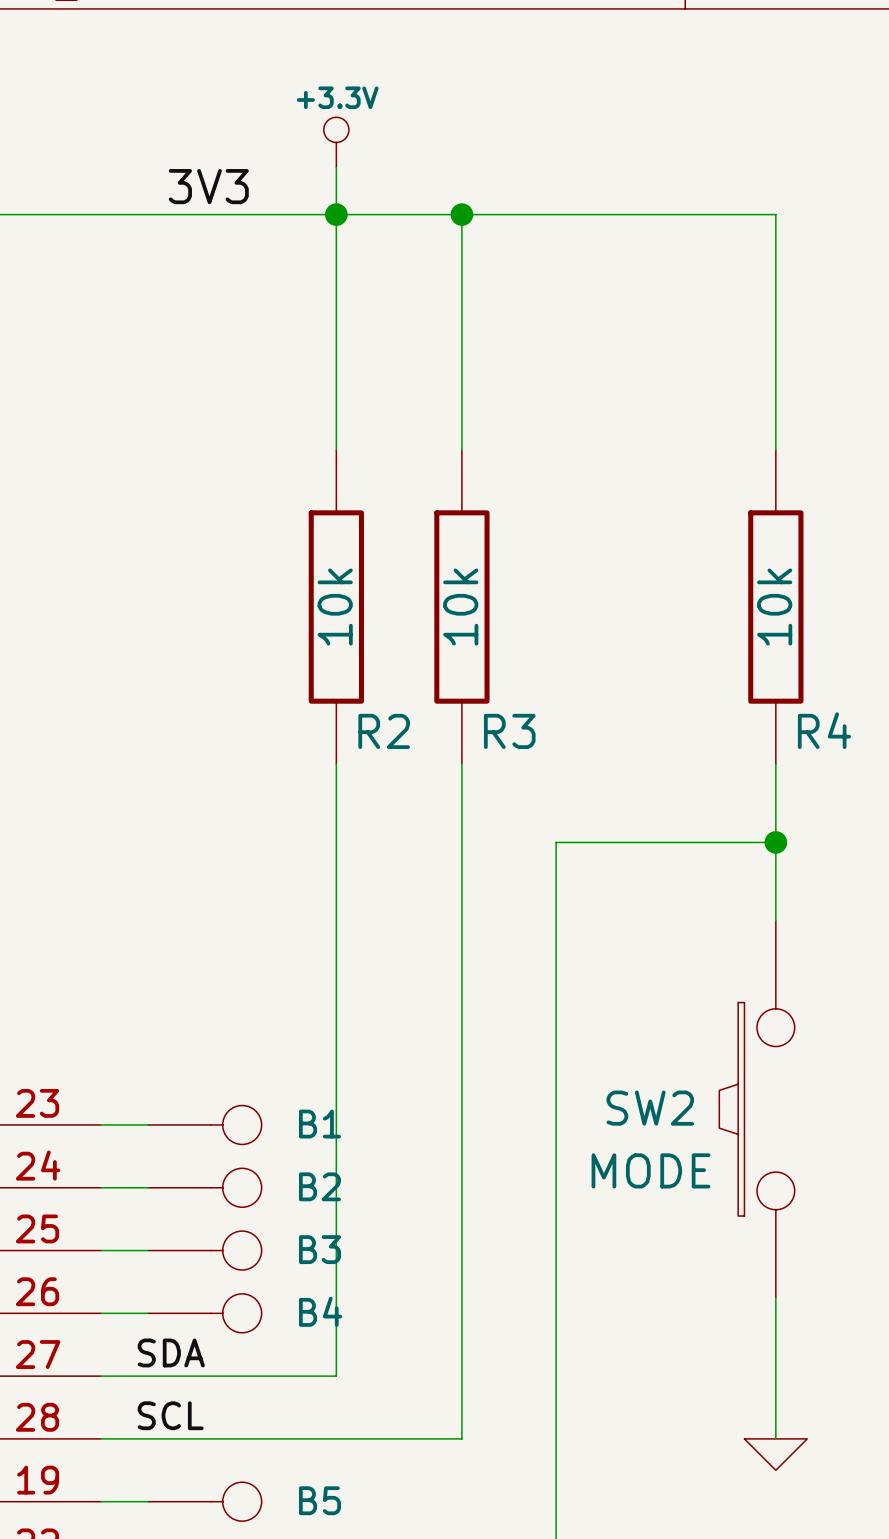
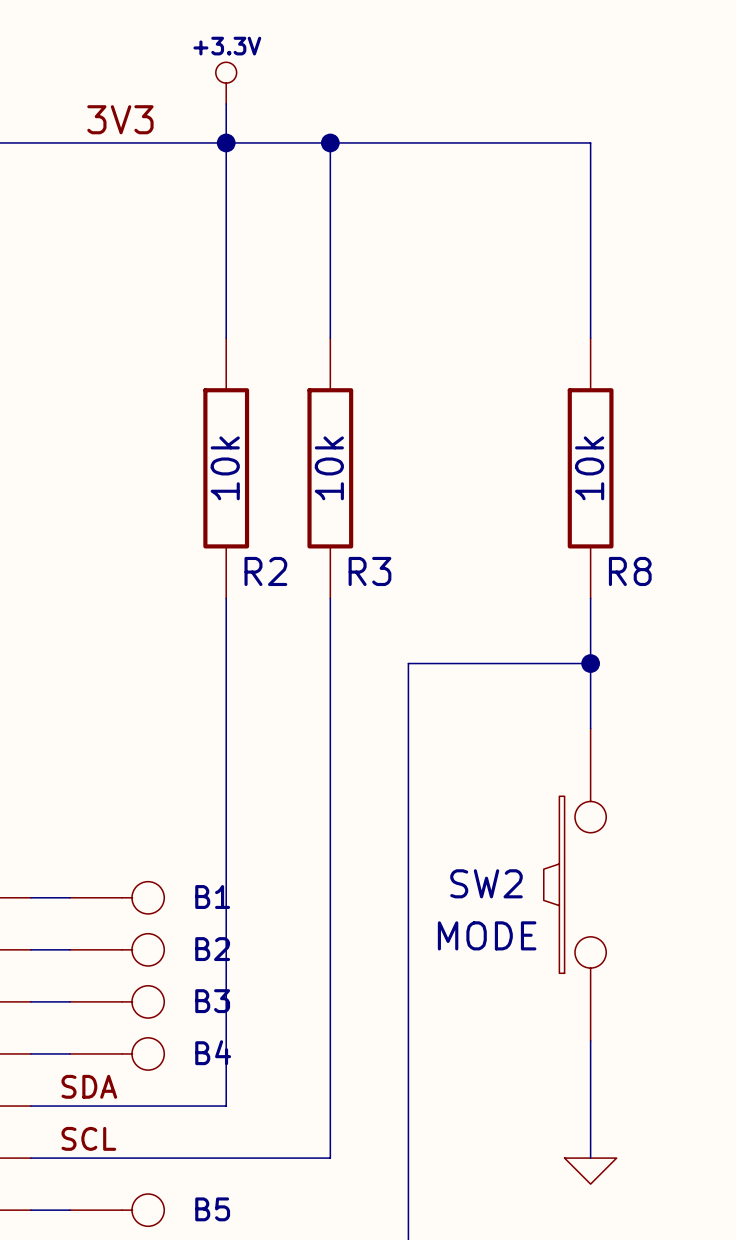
R4 name: R4 (824, 730) -> R8 (630, 571)

